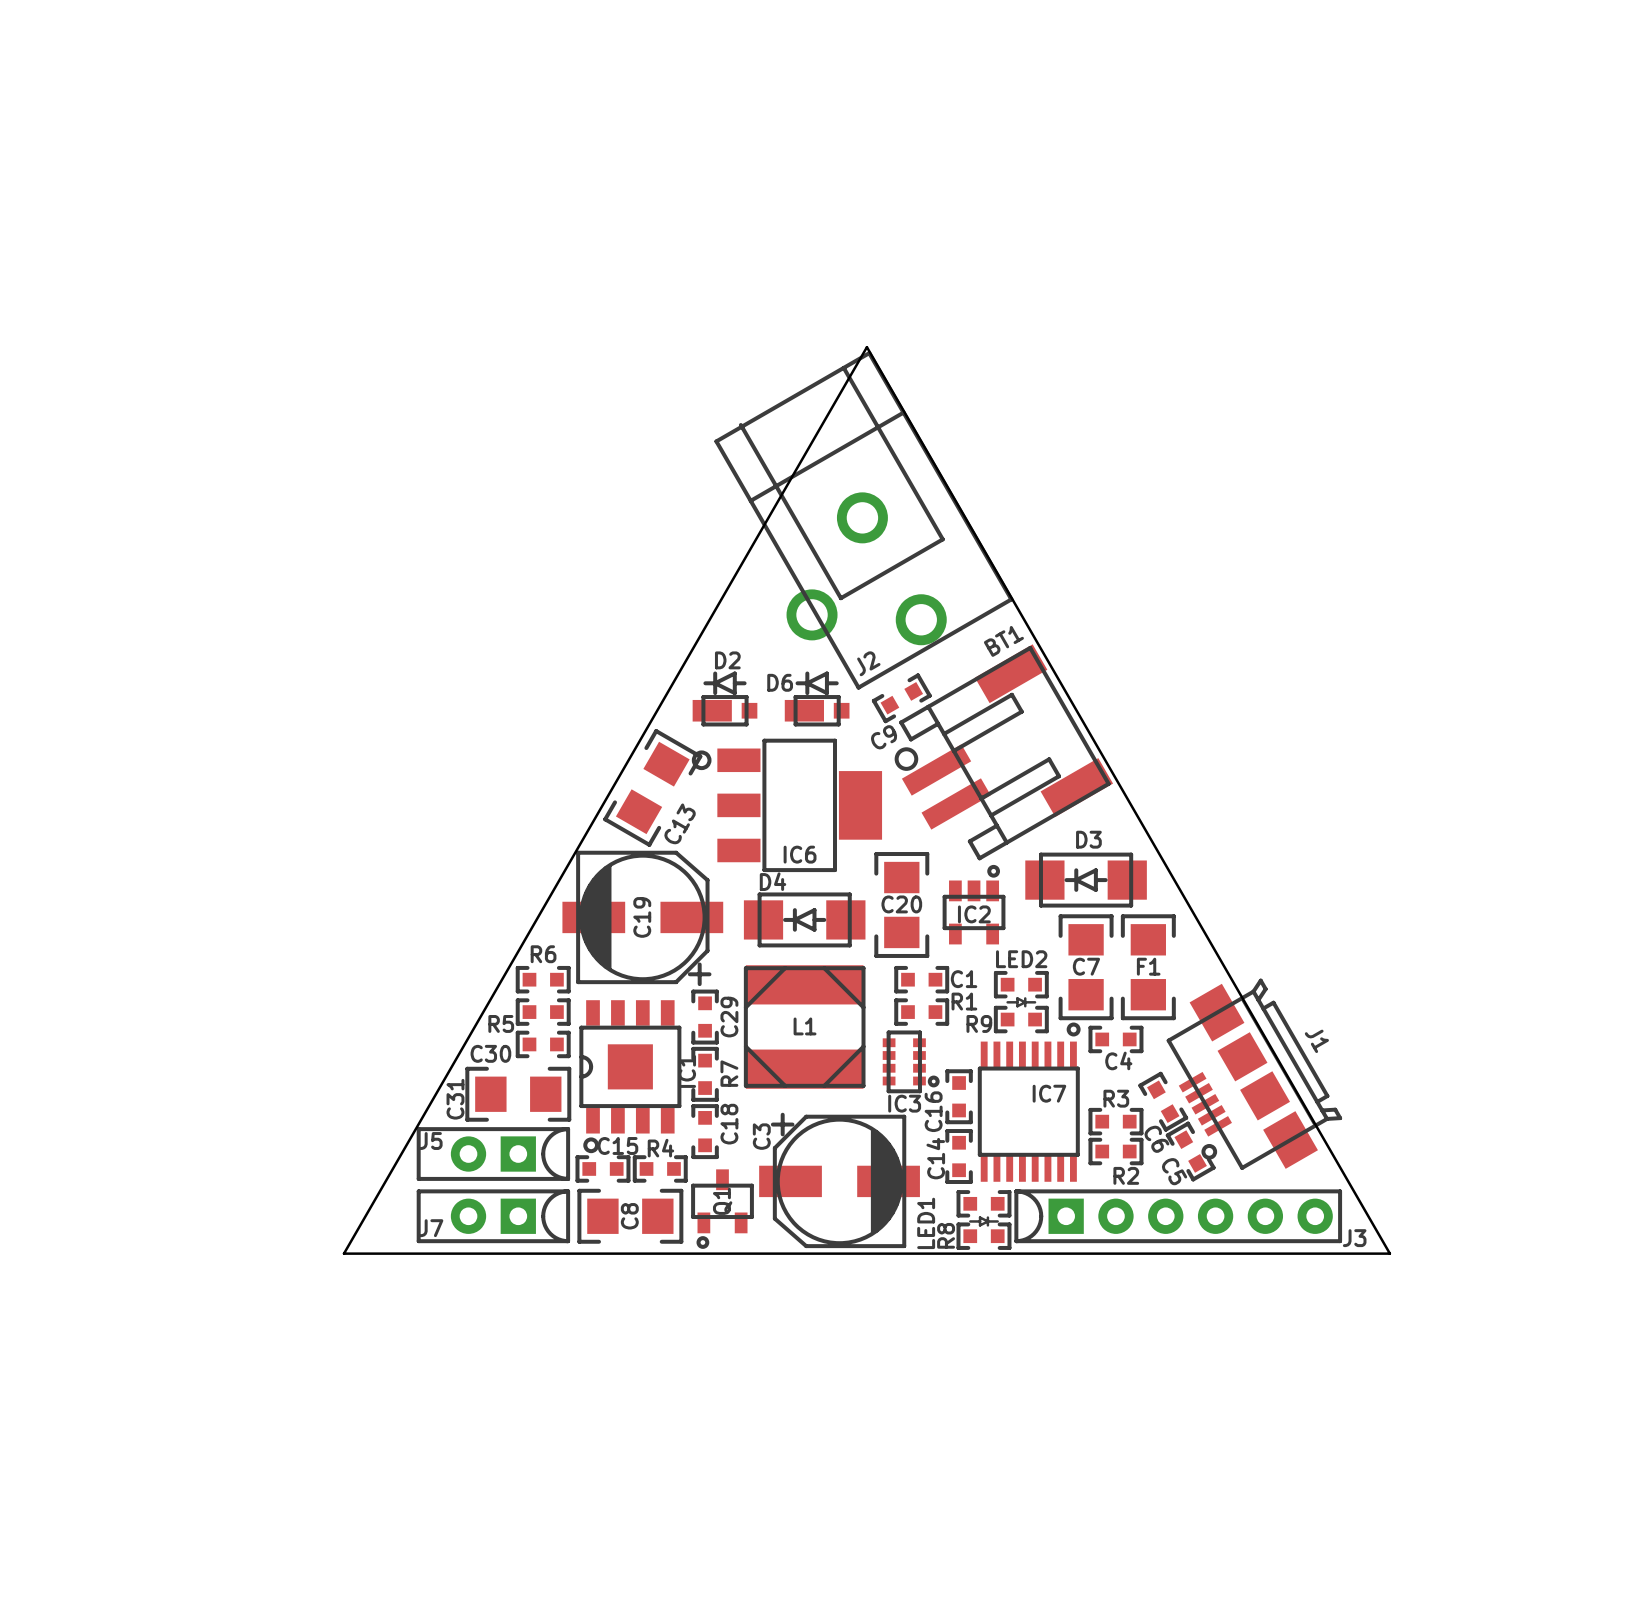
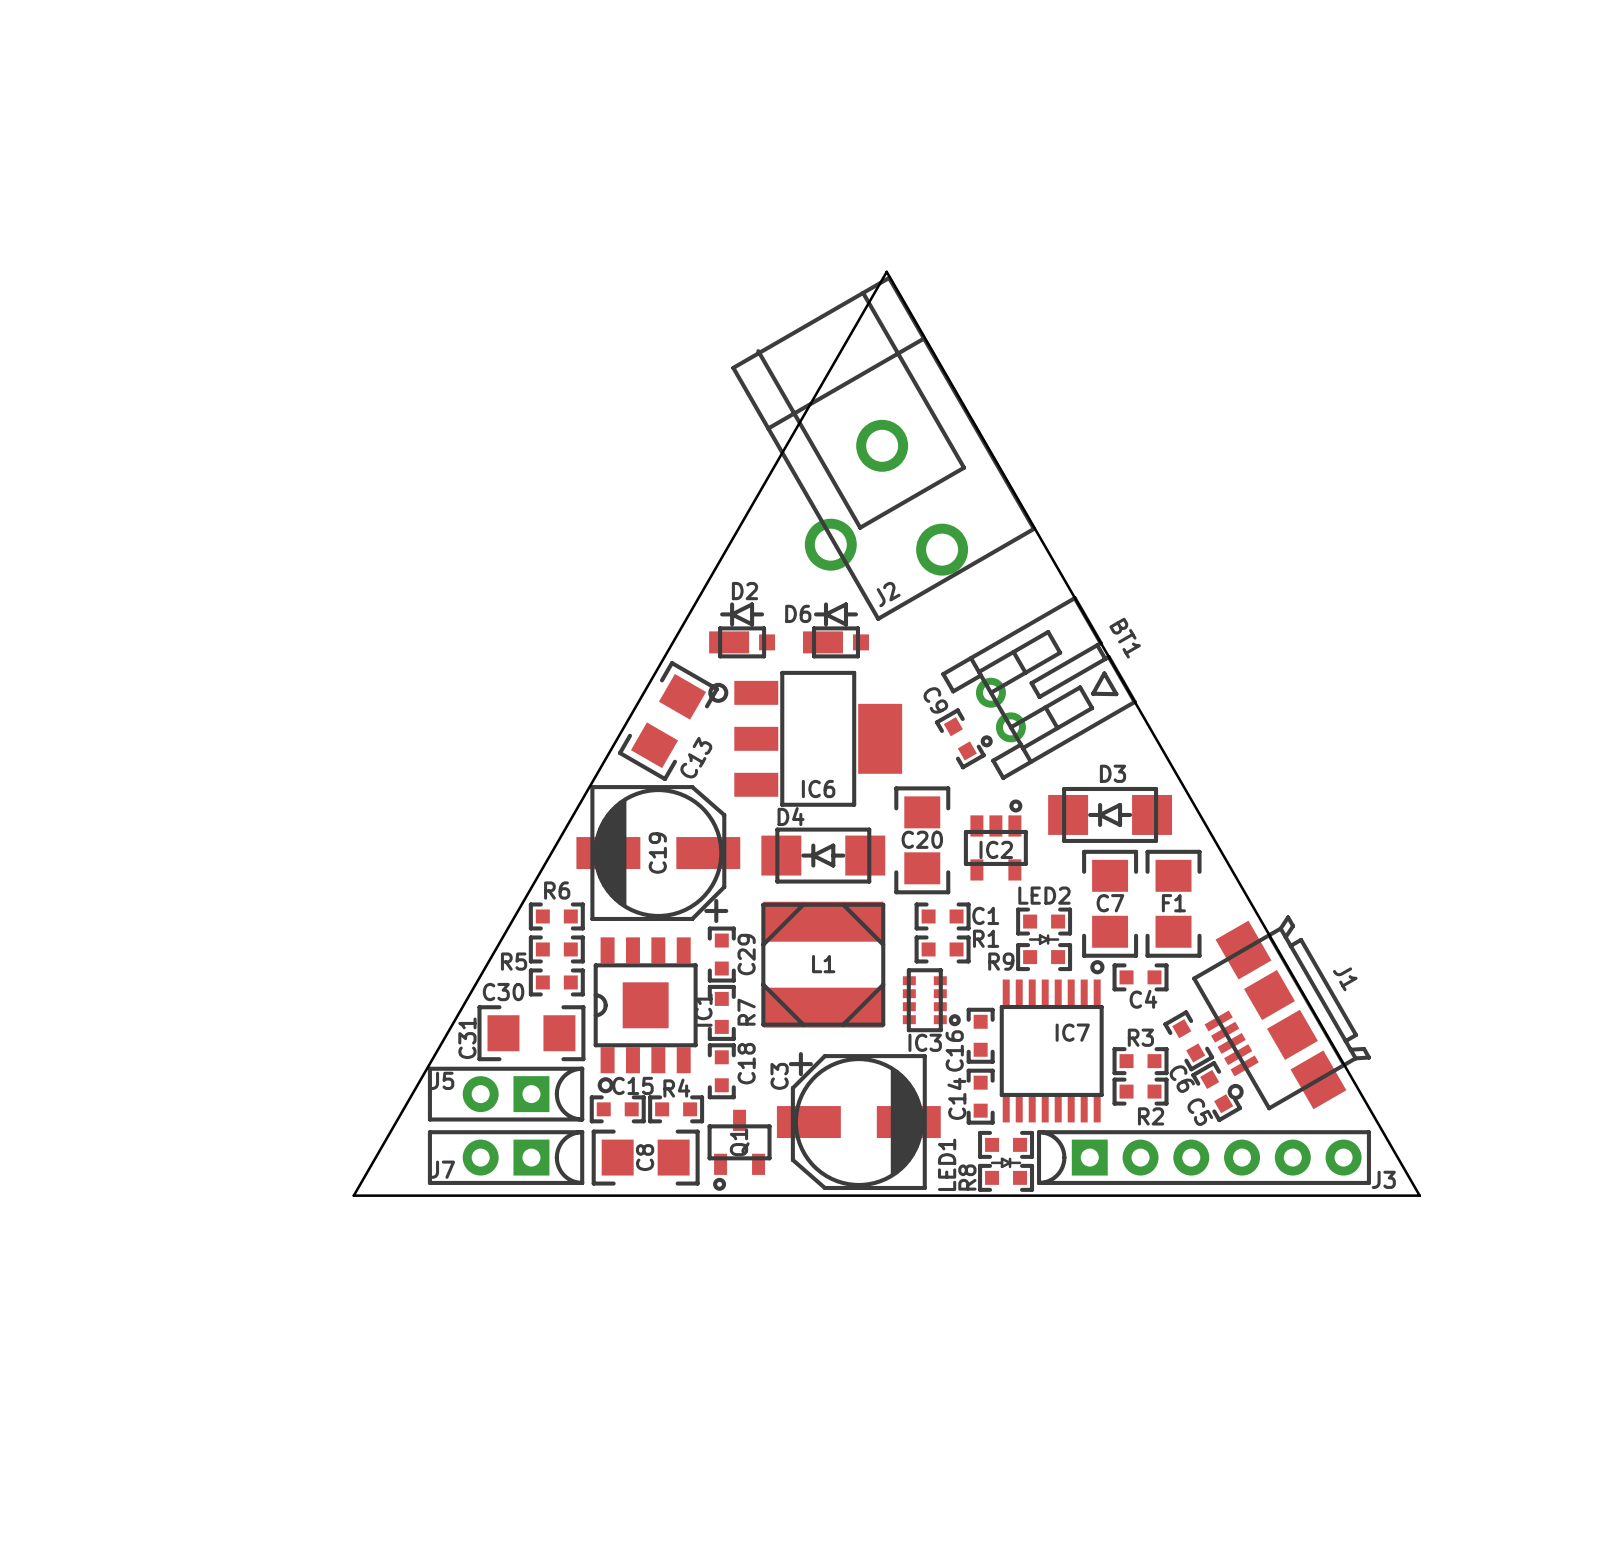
BT1 name position: BT1 (1003, 641) -> BT1 (1125, 638)
BT1 footprint: [894, 644, 1114, 861] -> [941, 596, 1137, 780]
C9 rotation: 0° (901, 698) -> 90° clockwise (960, 738)
C9 position: (901, 698) -> (960, 738)

